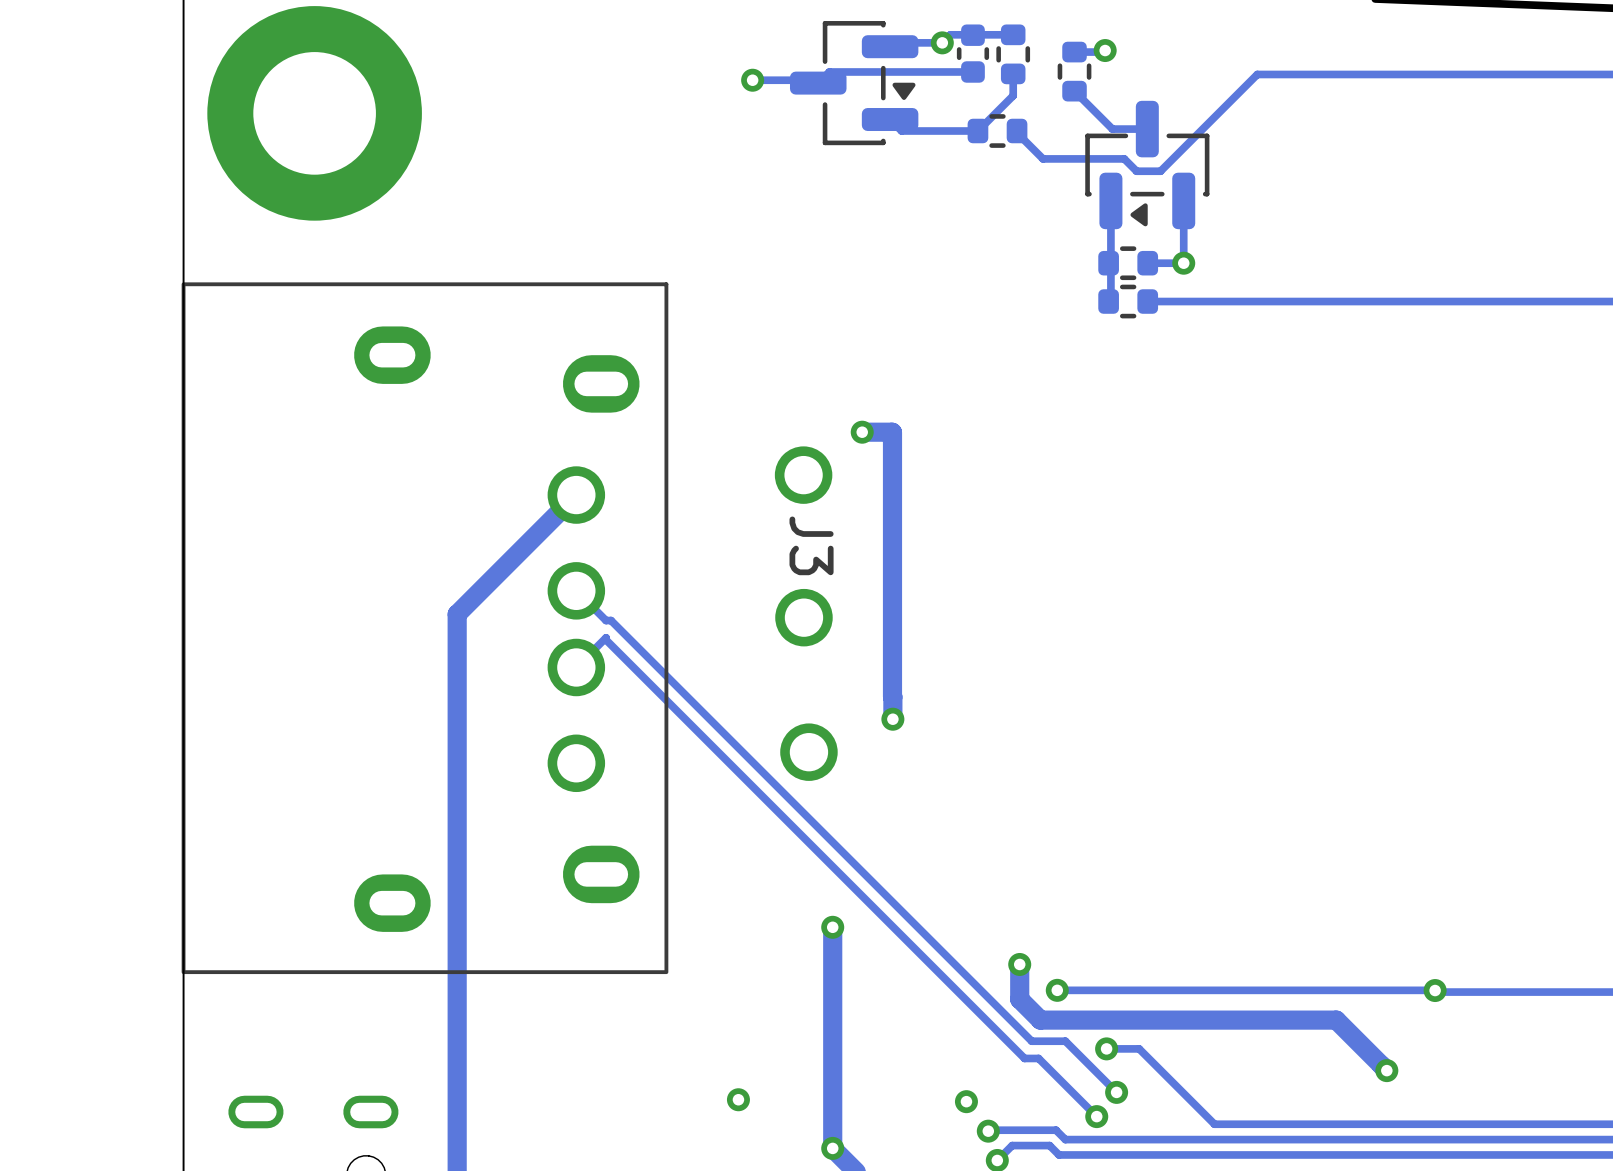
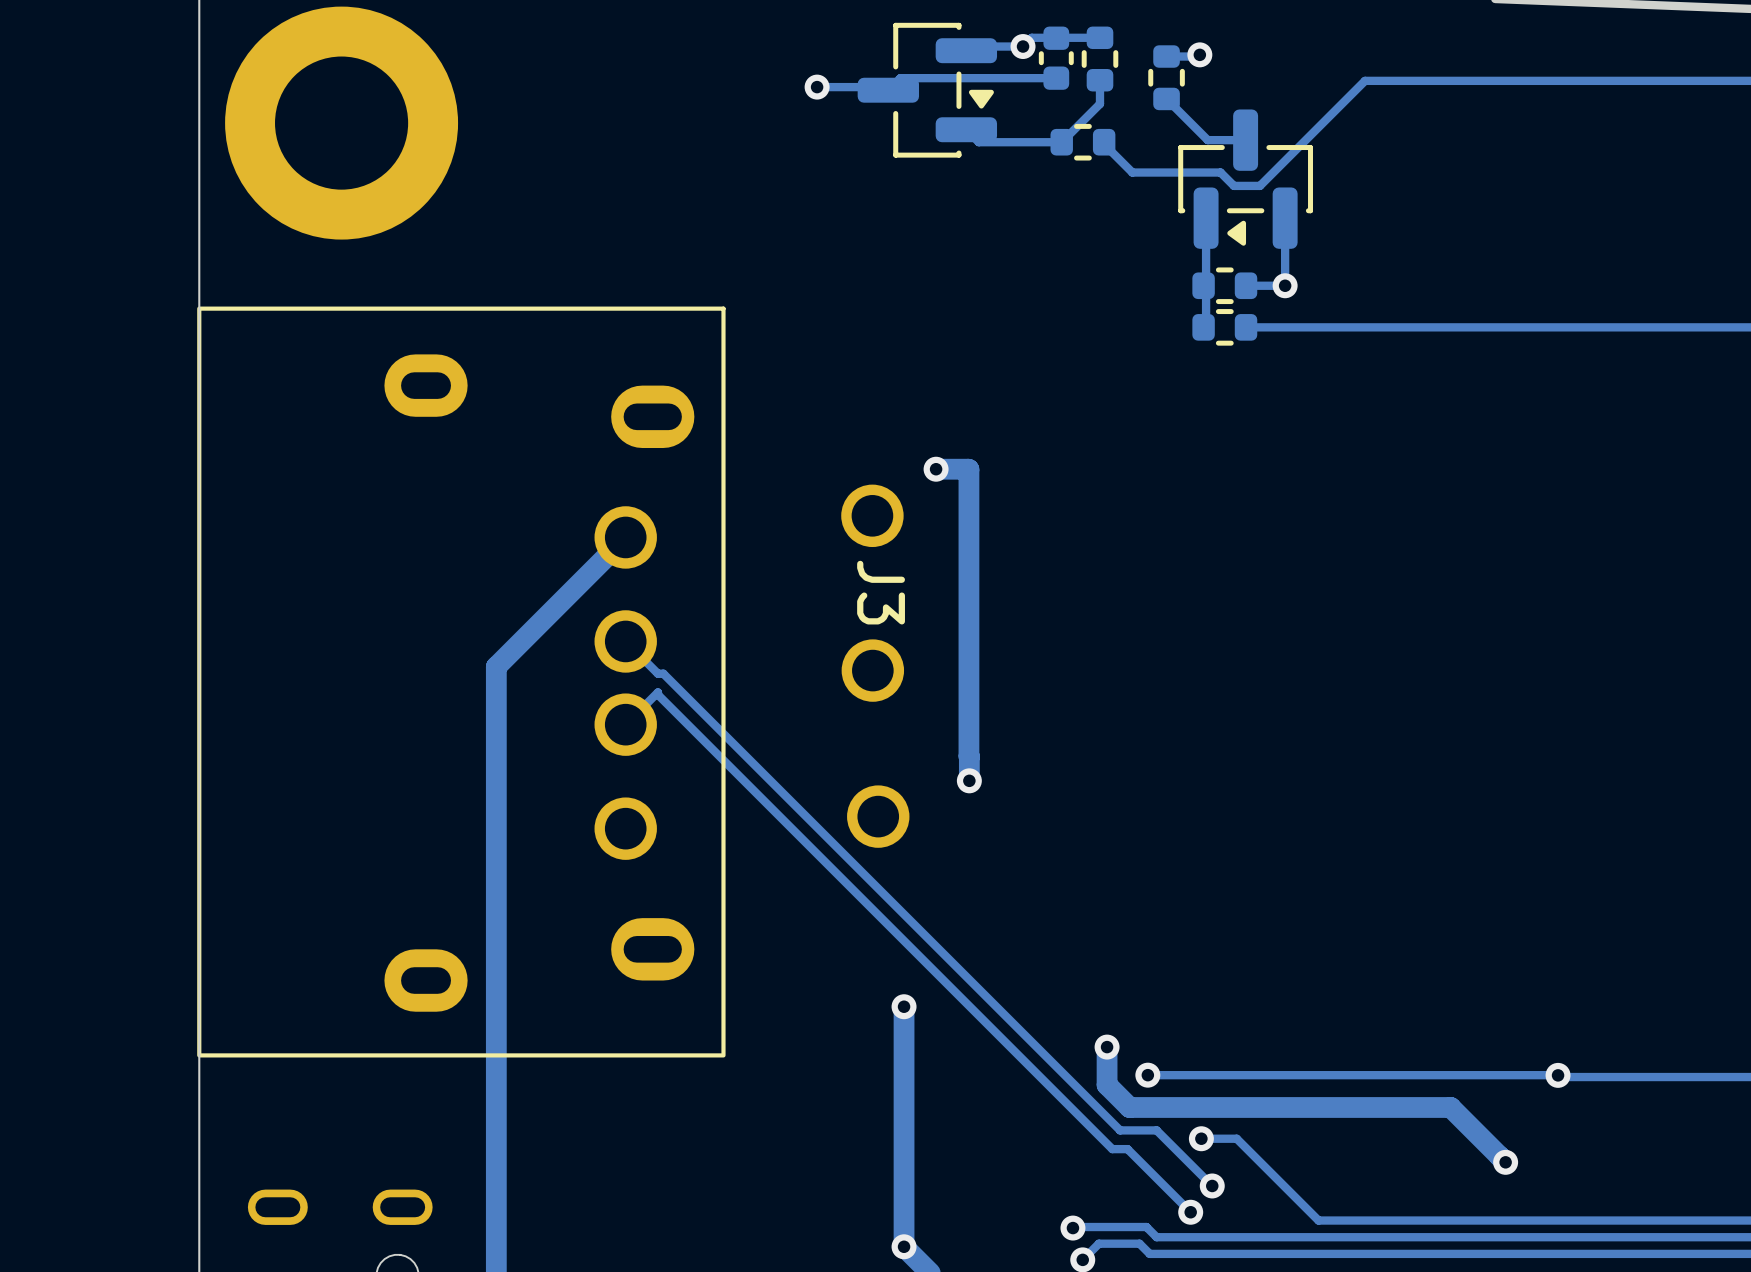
via: (738, 1099) -> none
via: (966, 1101) -> none

